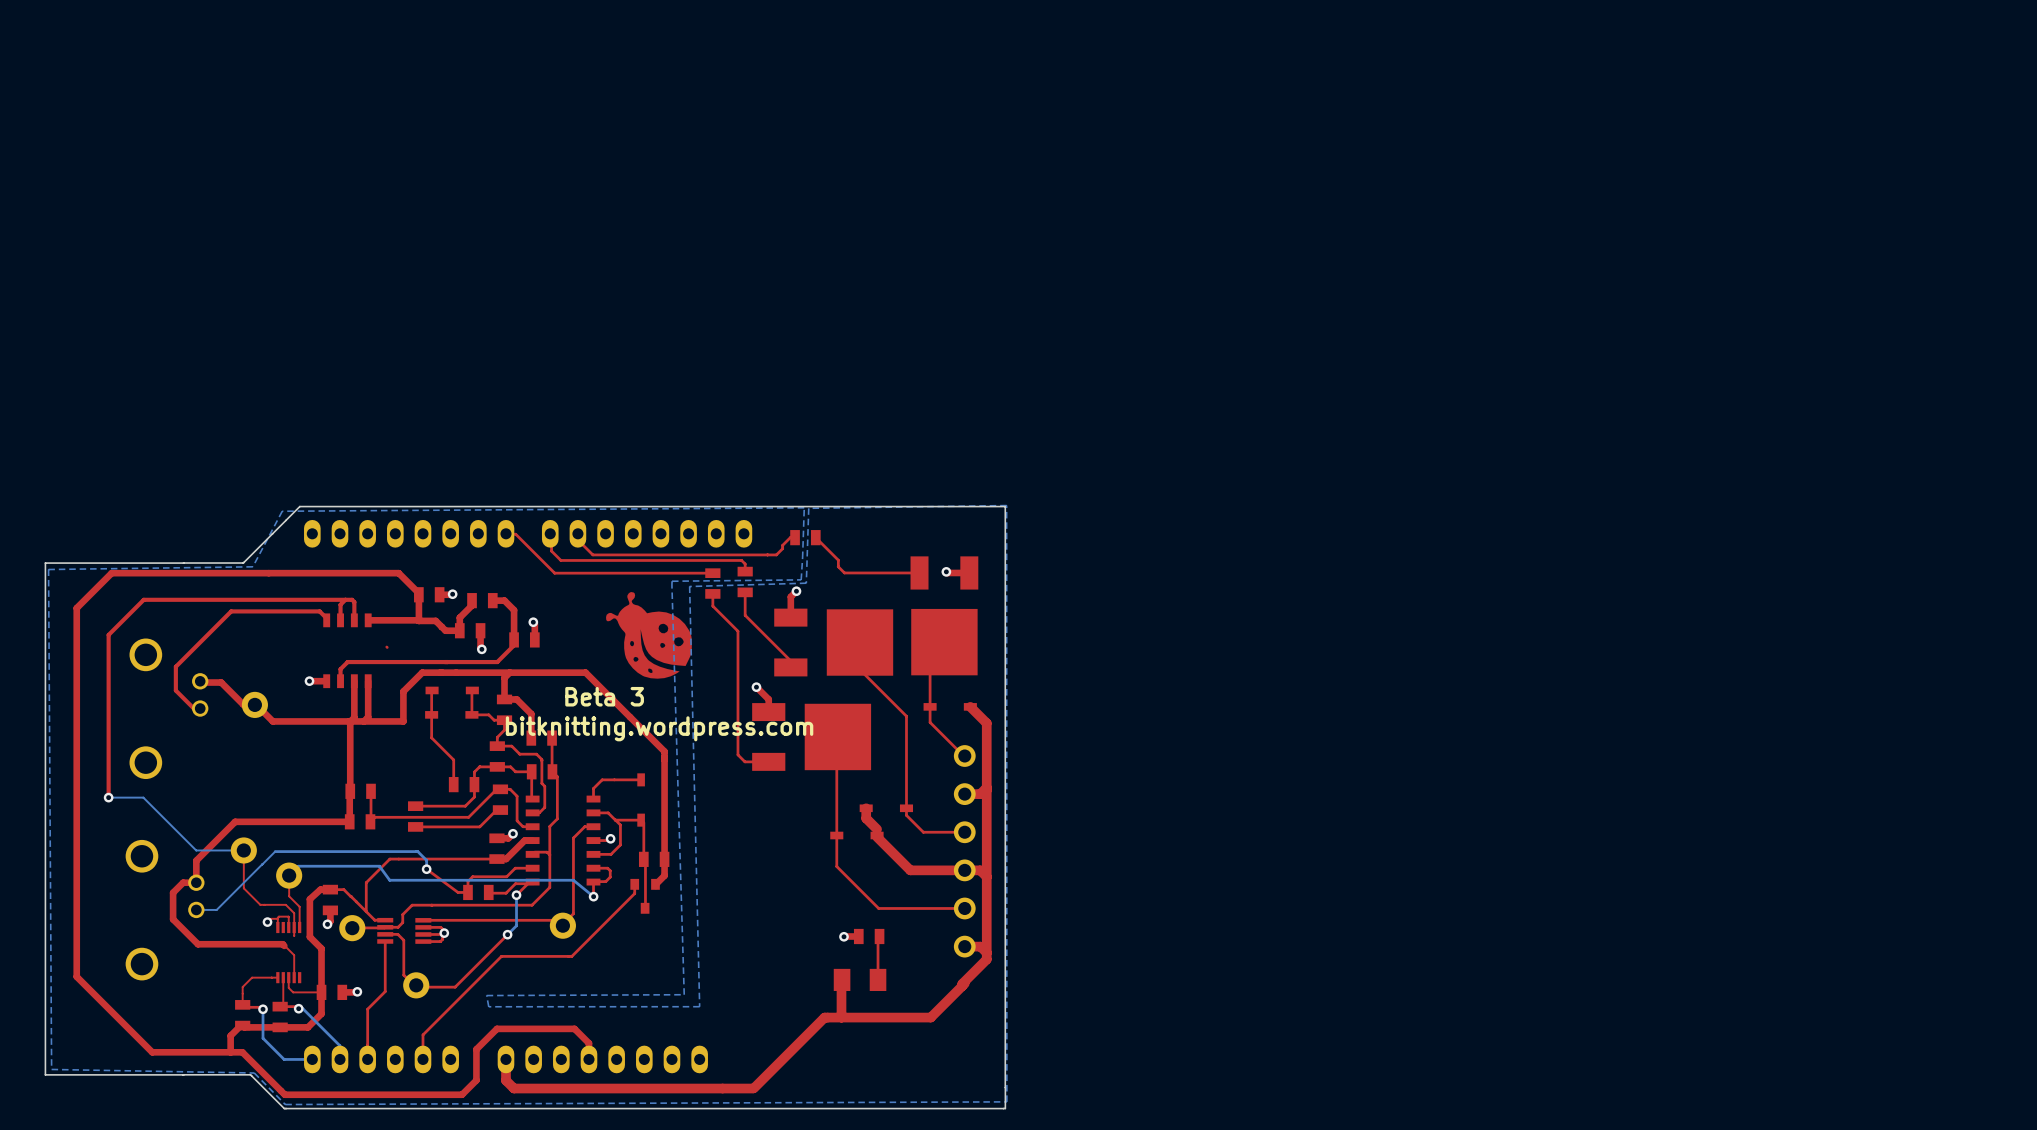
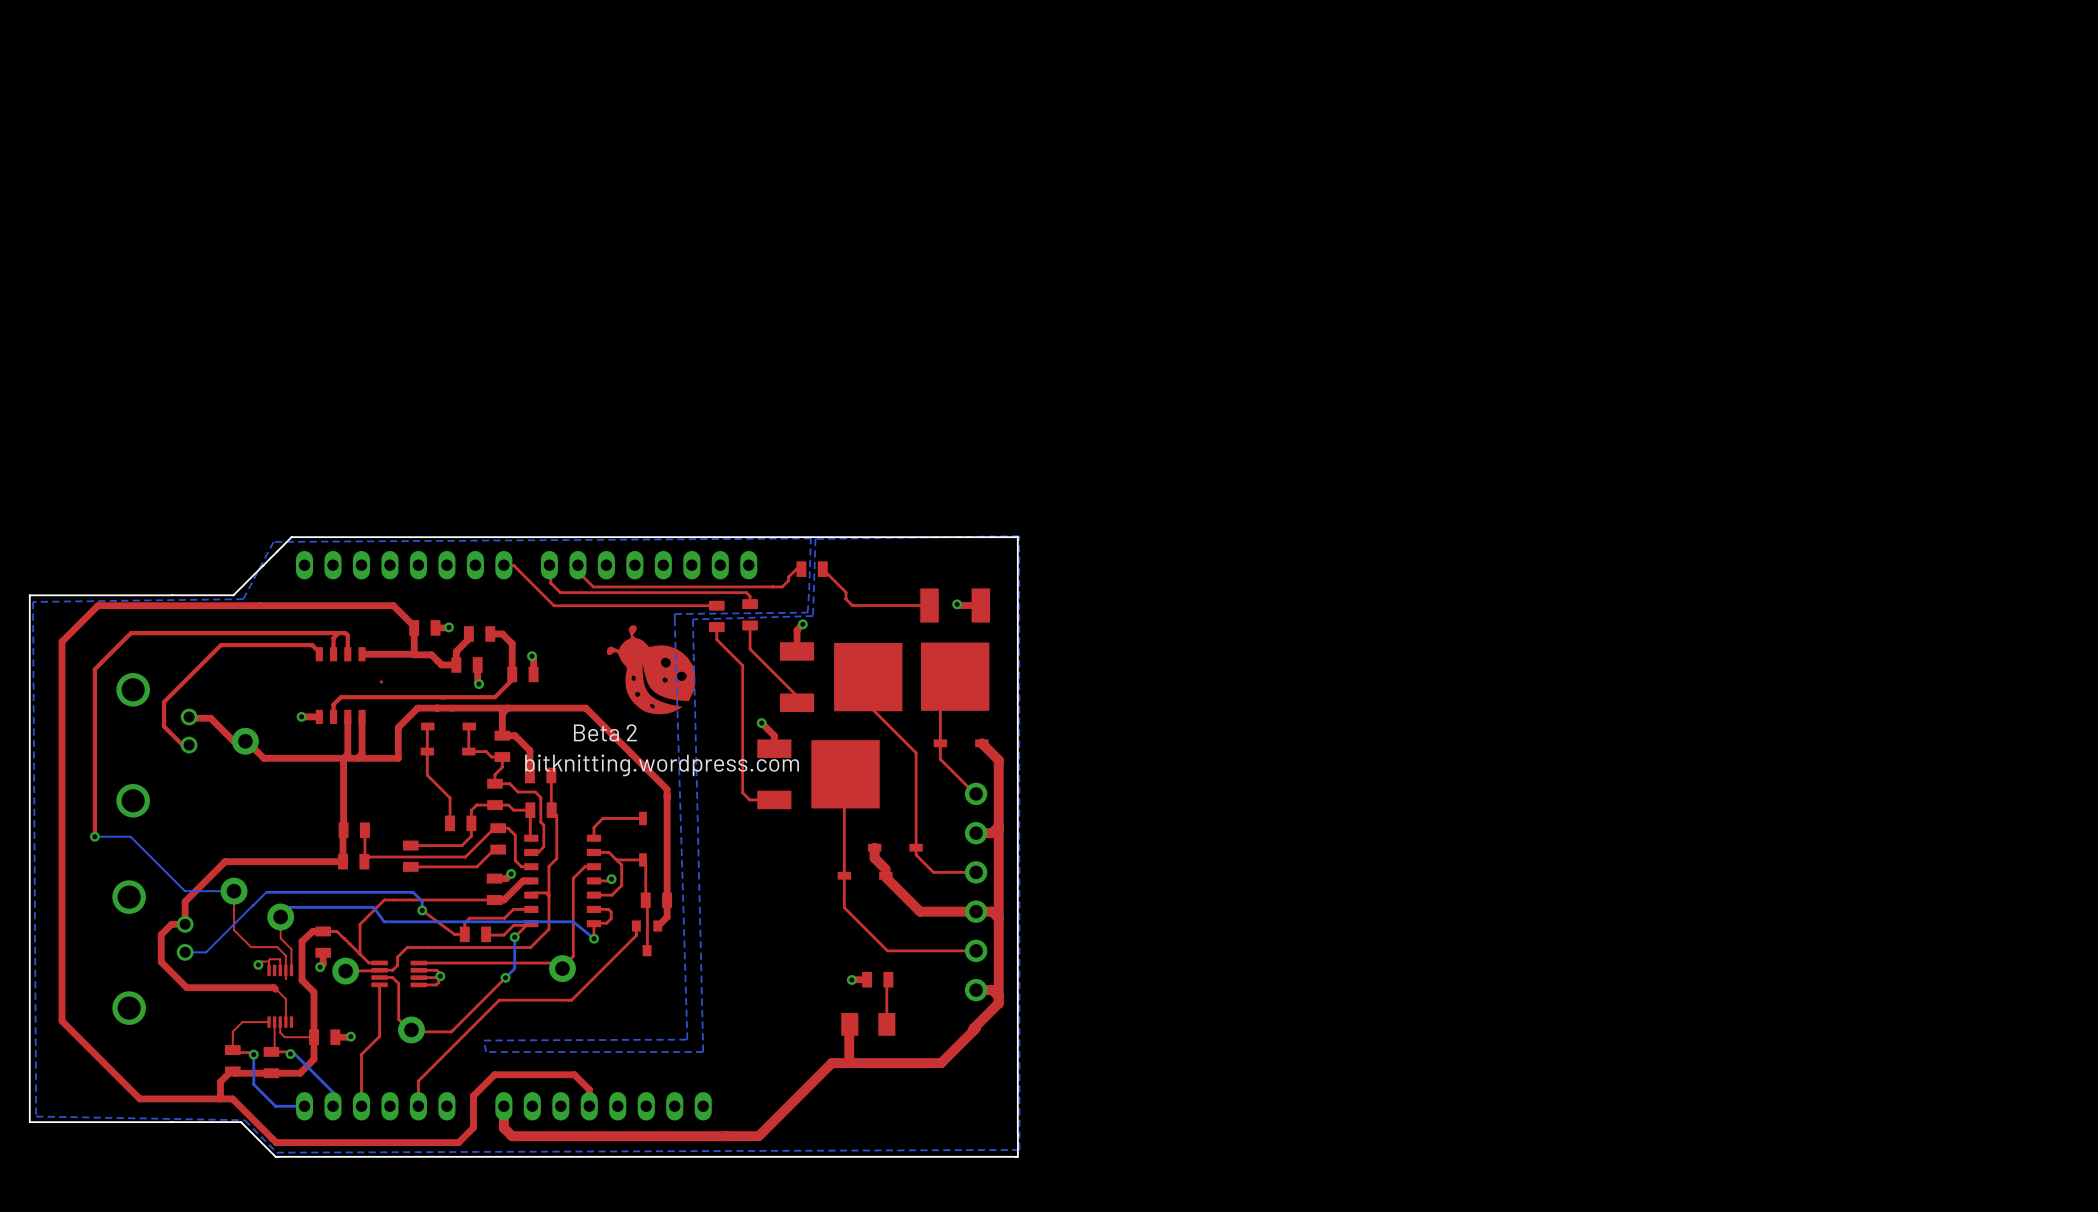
text: Beta 3 (604, 696) -> Beta 2 (605, 732)

